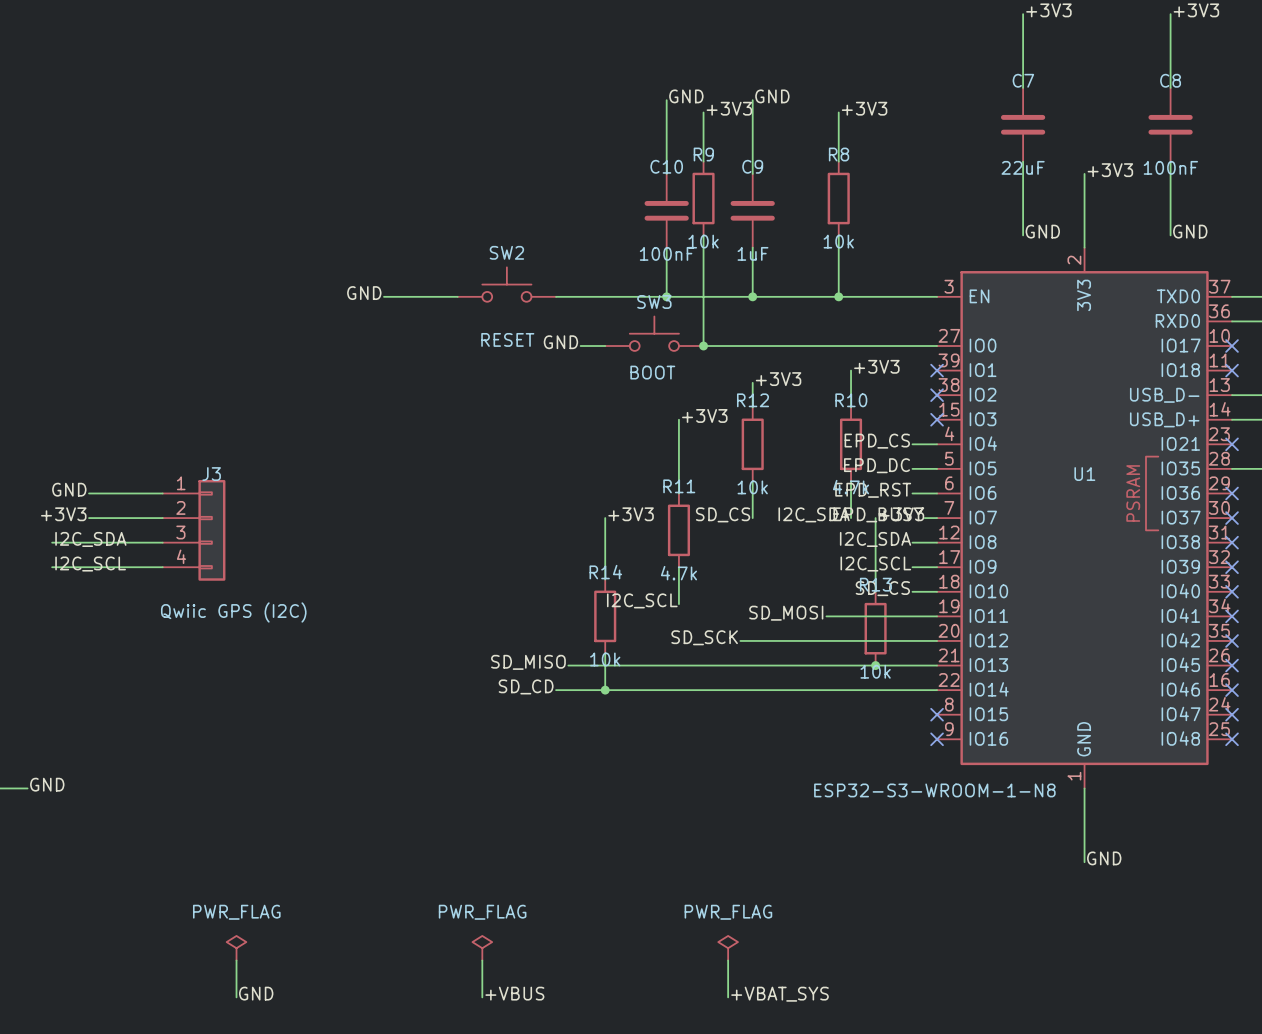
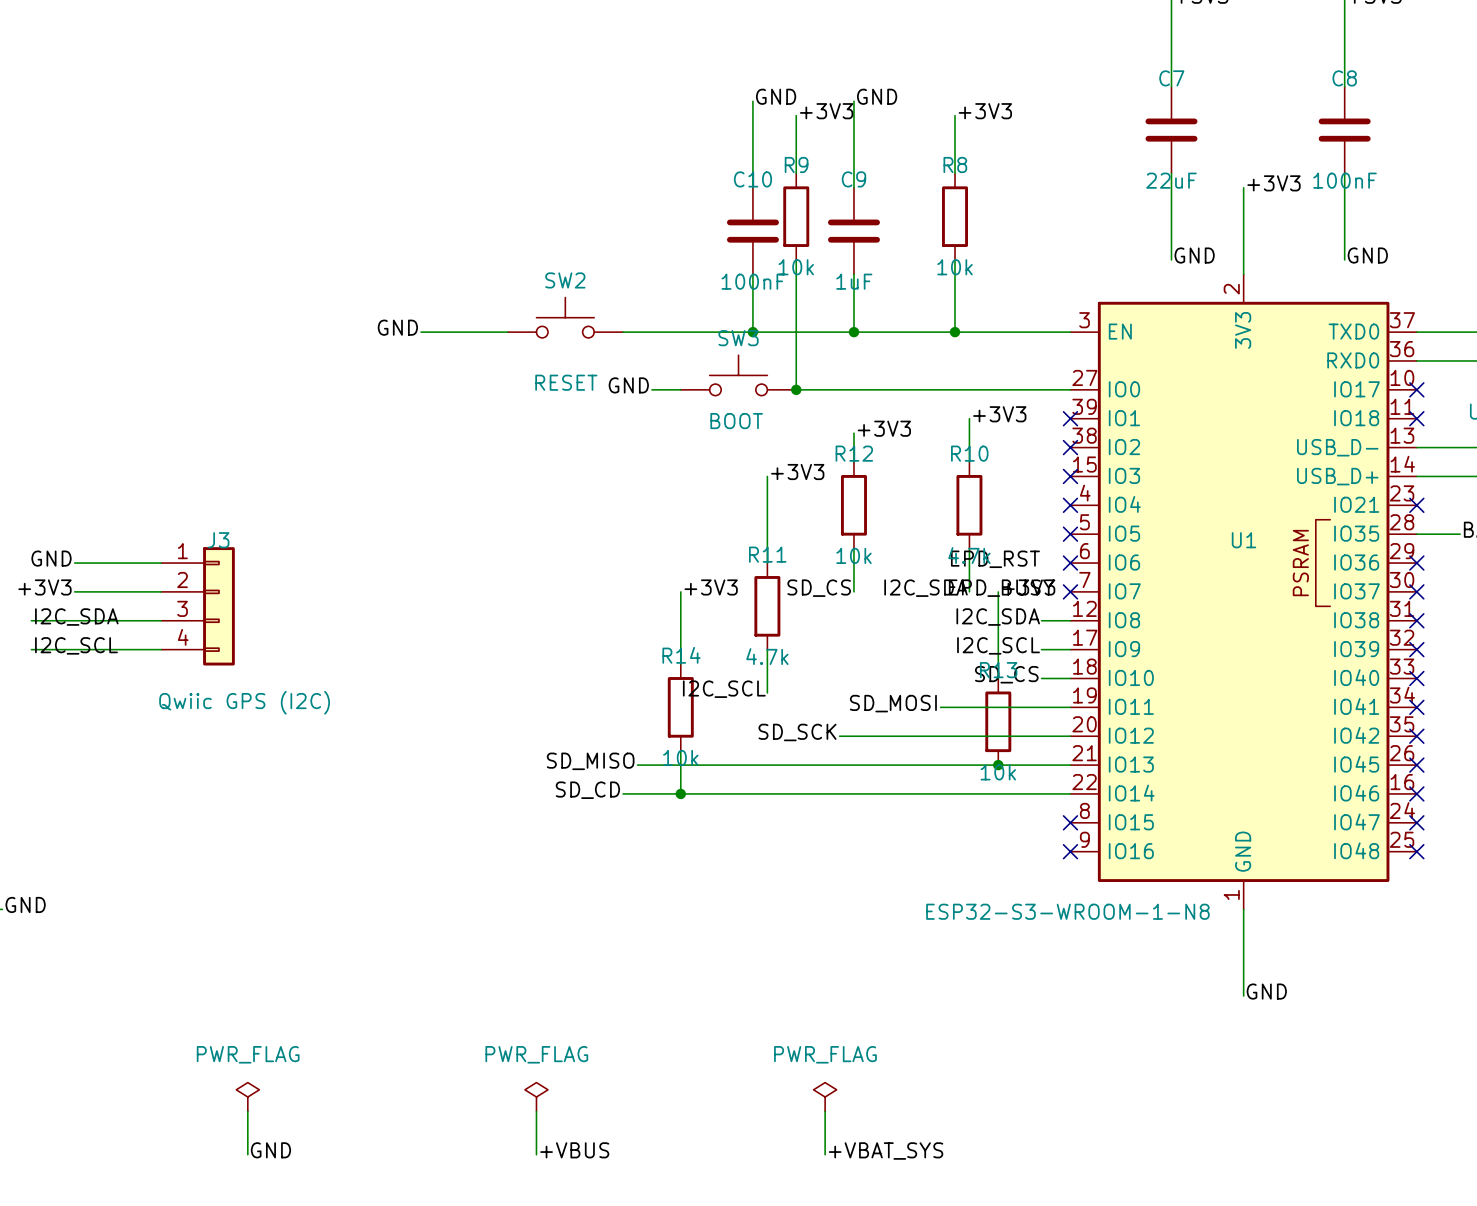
label: EPD_CS (877, 441) -> none
wire: (912, 444) (937, 444) -> none
no-connect mark: none -> (1070, 505)
label: EPD_DC (876, 465) -> none
wire: (912, 468) (937, 468) -> none
no-connect mark: none -> (1070, 534)
wire: (912, 493) (937, 493) -> none
no-connect mark: none -> (1070, 563)
wire: (924, 518) (937, 518) -> none
no-connect mark: none -> (1070, 591)

